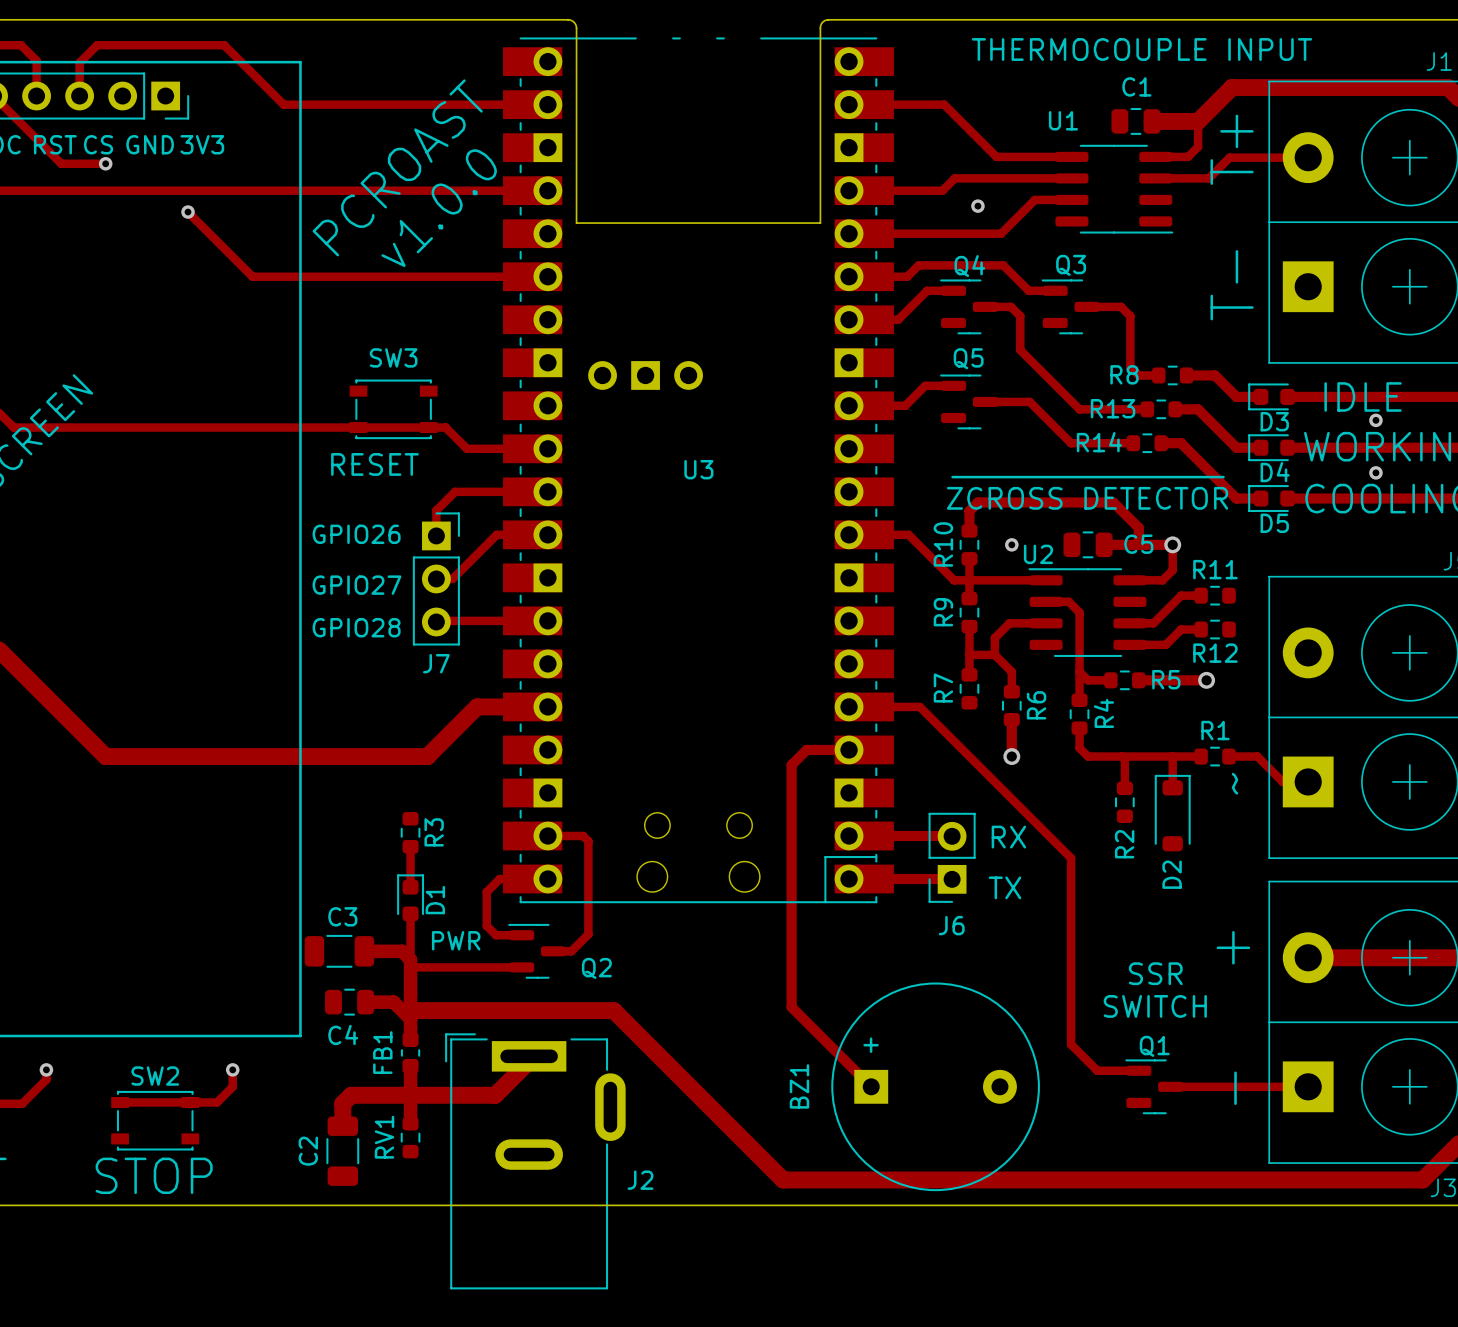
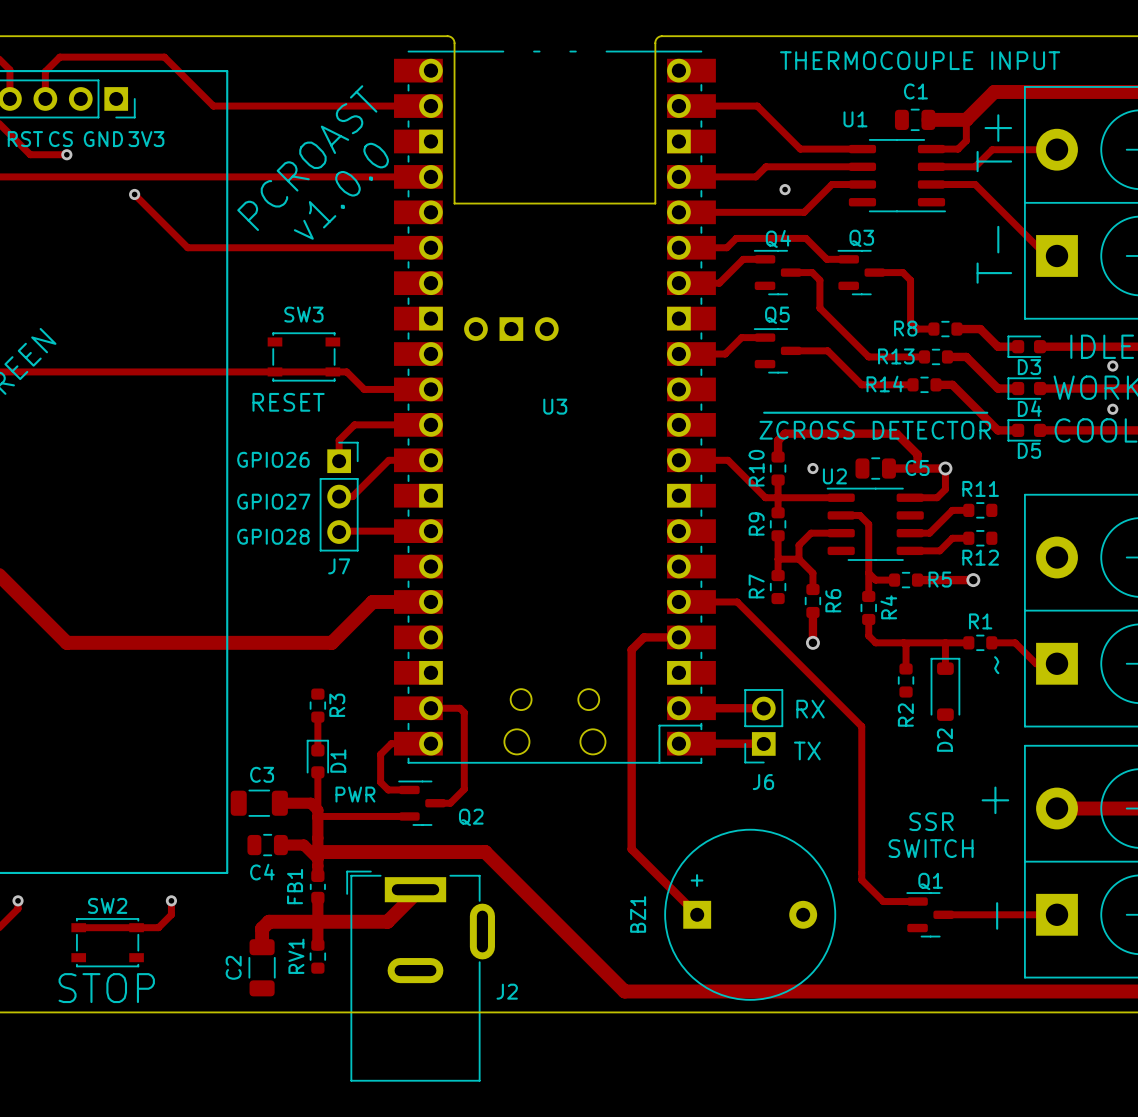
track: none -> (931, 184) (975, 184) (1046, 255)

